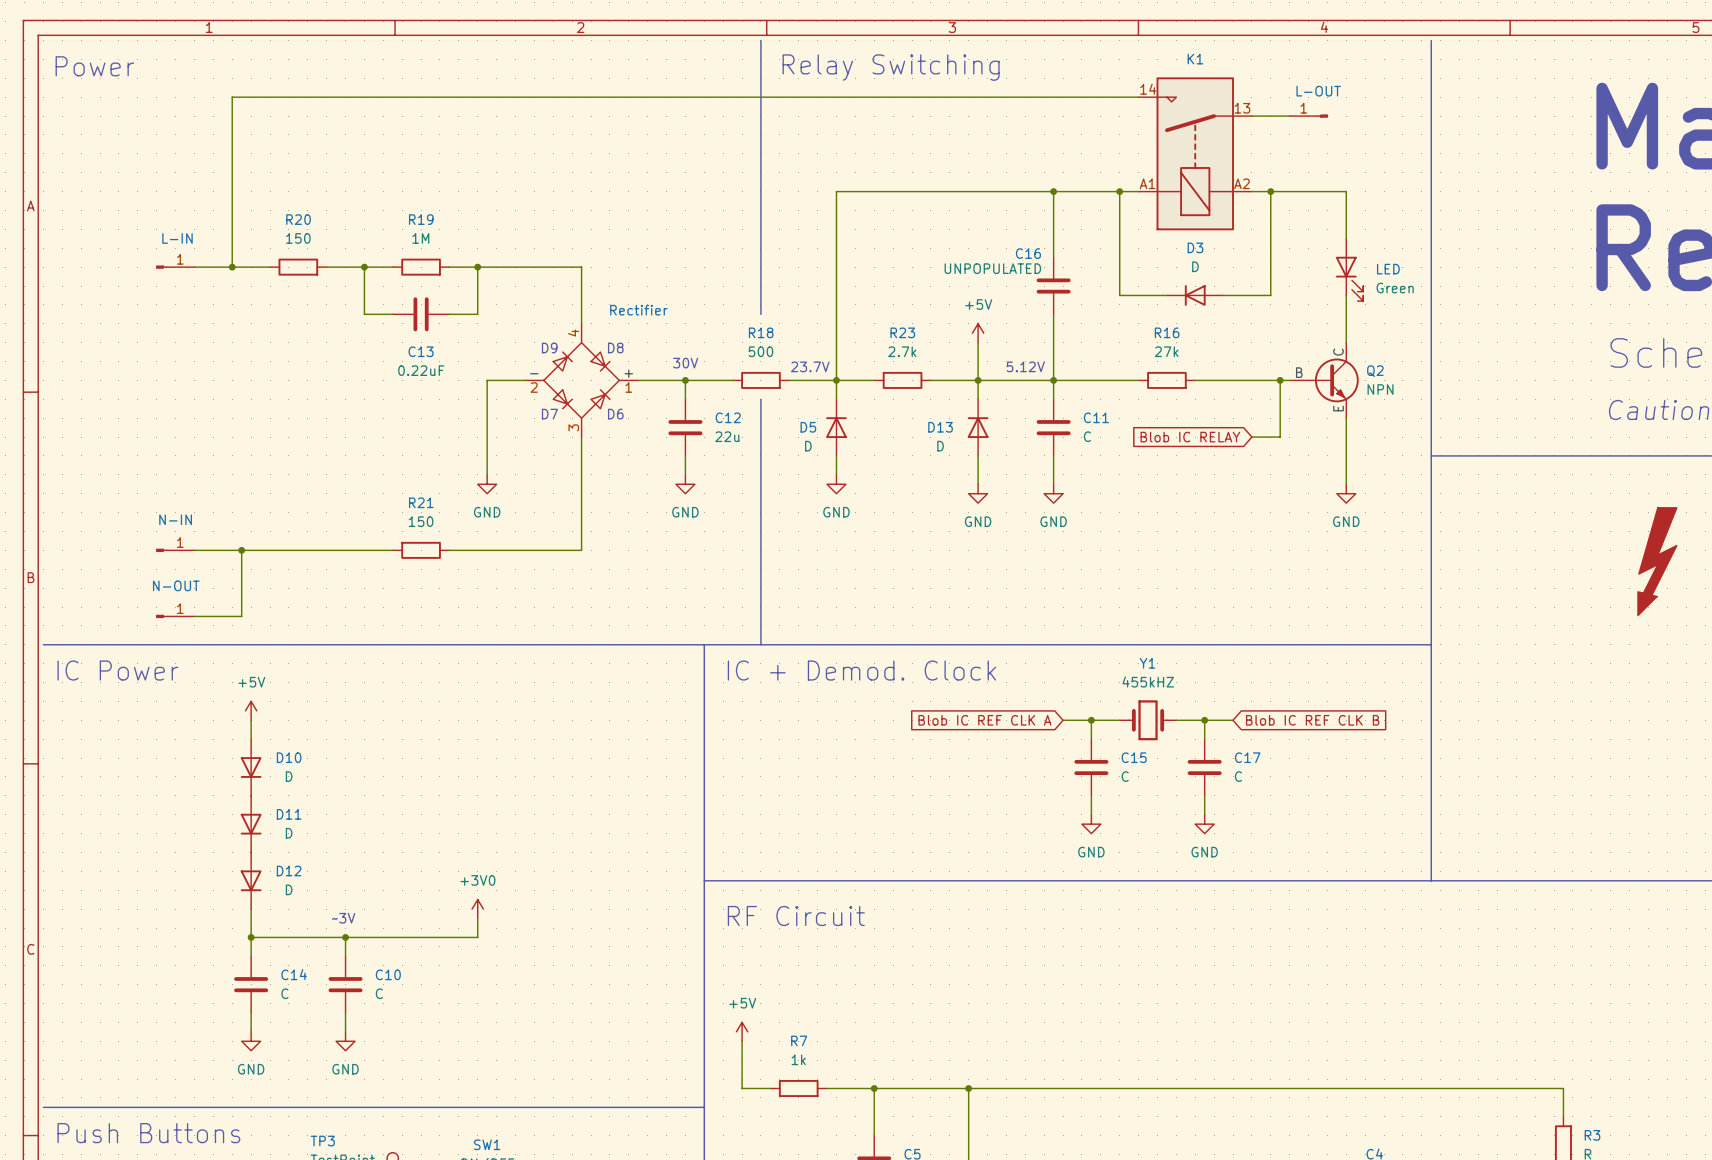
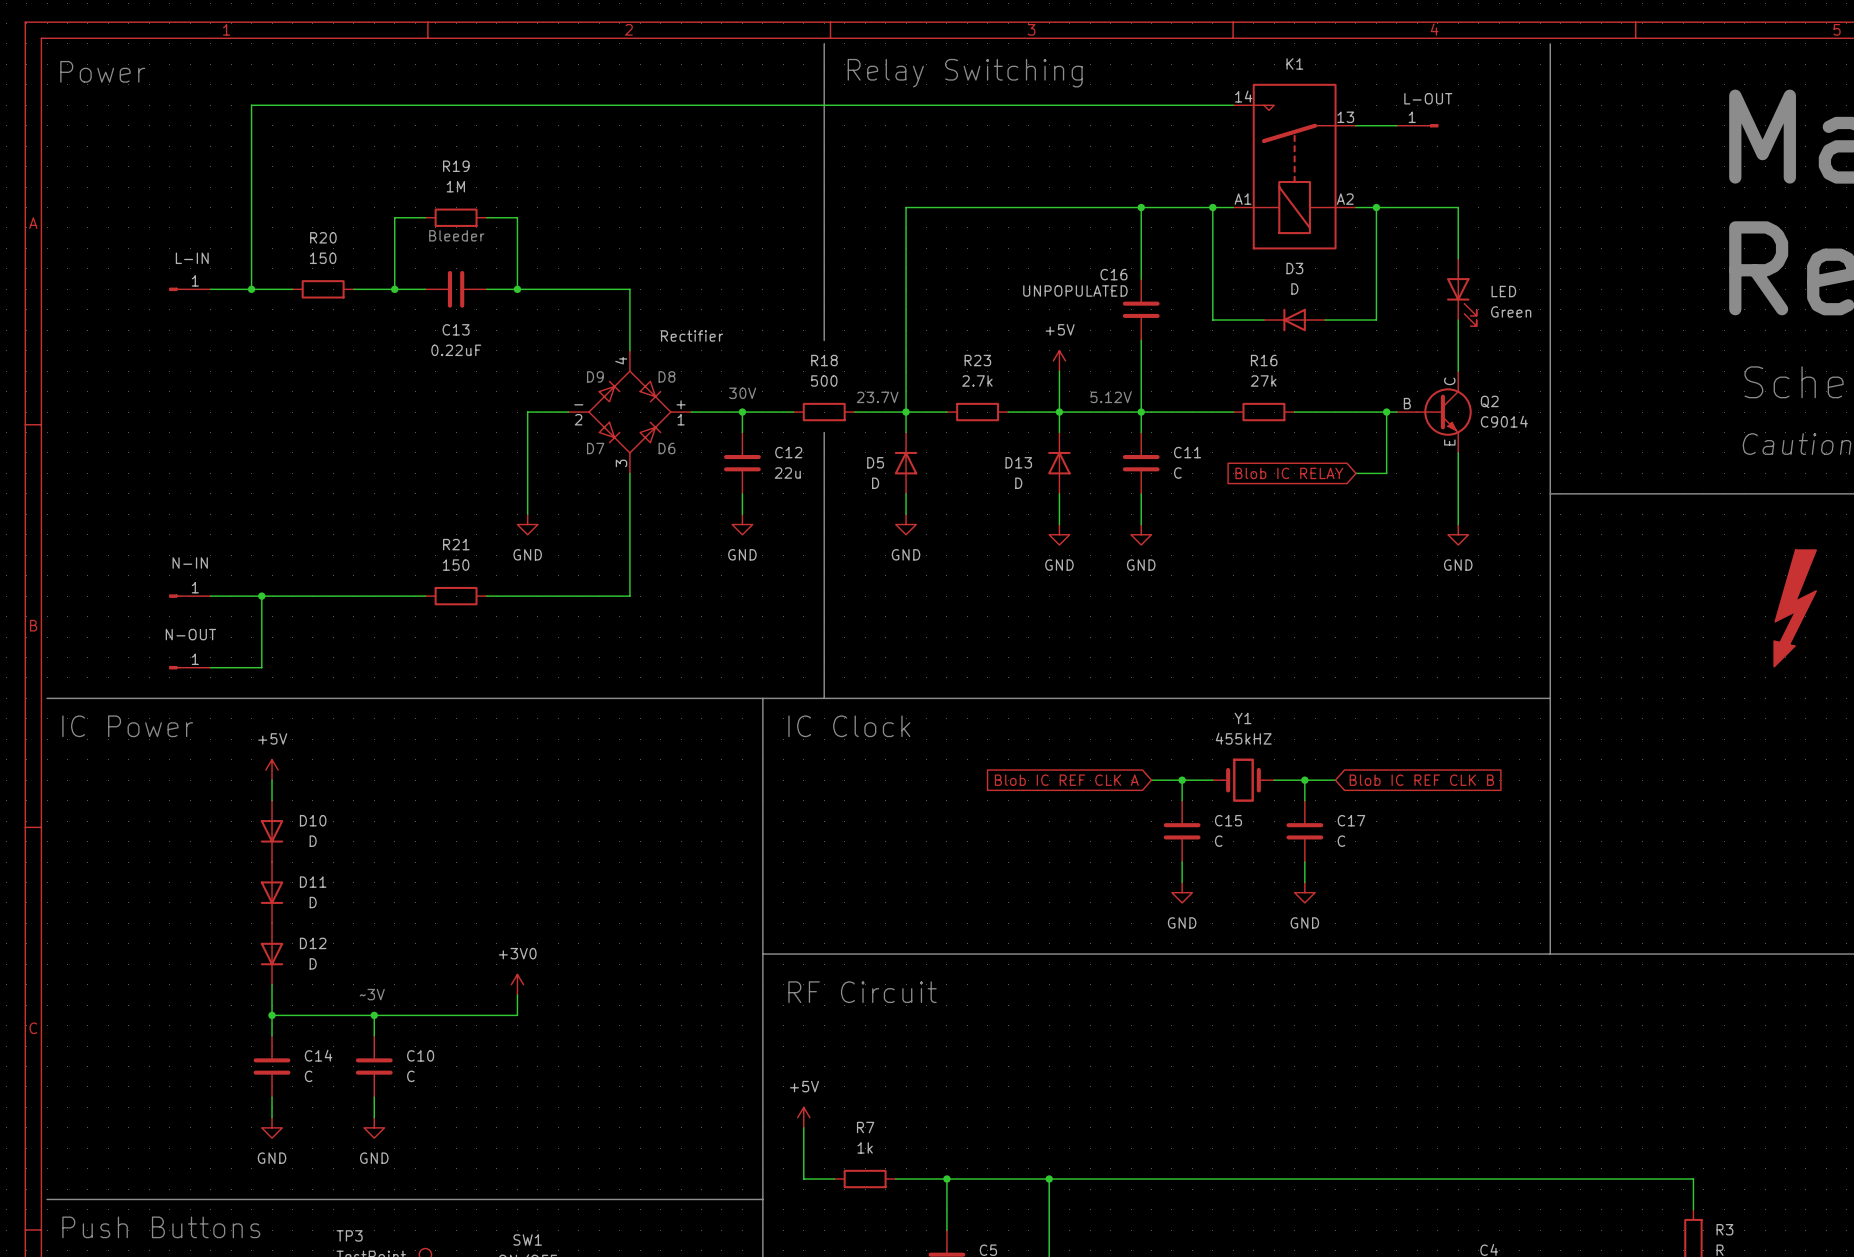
text: none -> Bleeder (456, 235)
wire: (364, 267) (364, 314) (392, 314) -> (394, 289) (394, 217) (425, 217)
R19 position: (421, 267) -> (456, 217)
wire: (477, 267) (477, 314) (449, 314) -> (517, 289) (517, 217) (486, 217)
C13 position: (421, 314) -> (456, 289)
Q2 value: NPN (1380, 389) -> C9014 (1504, 421)
text: IC + Demod. Clock (861, 670) -> IC Clock (849, 726)

